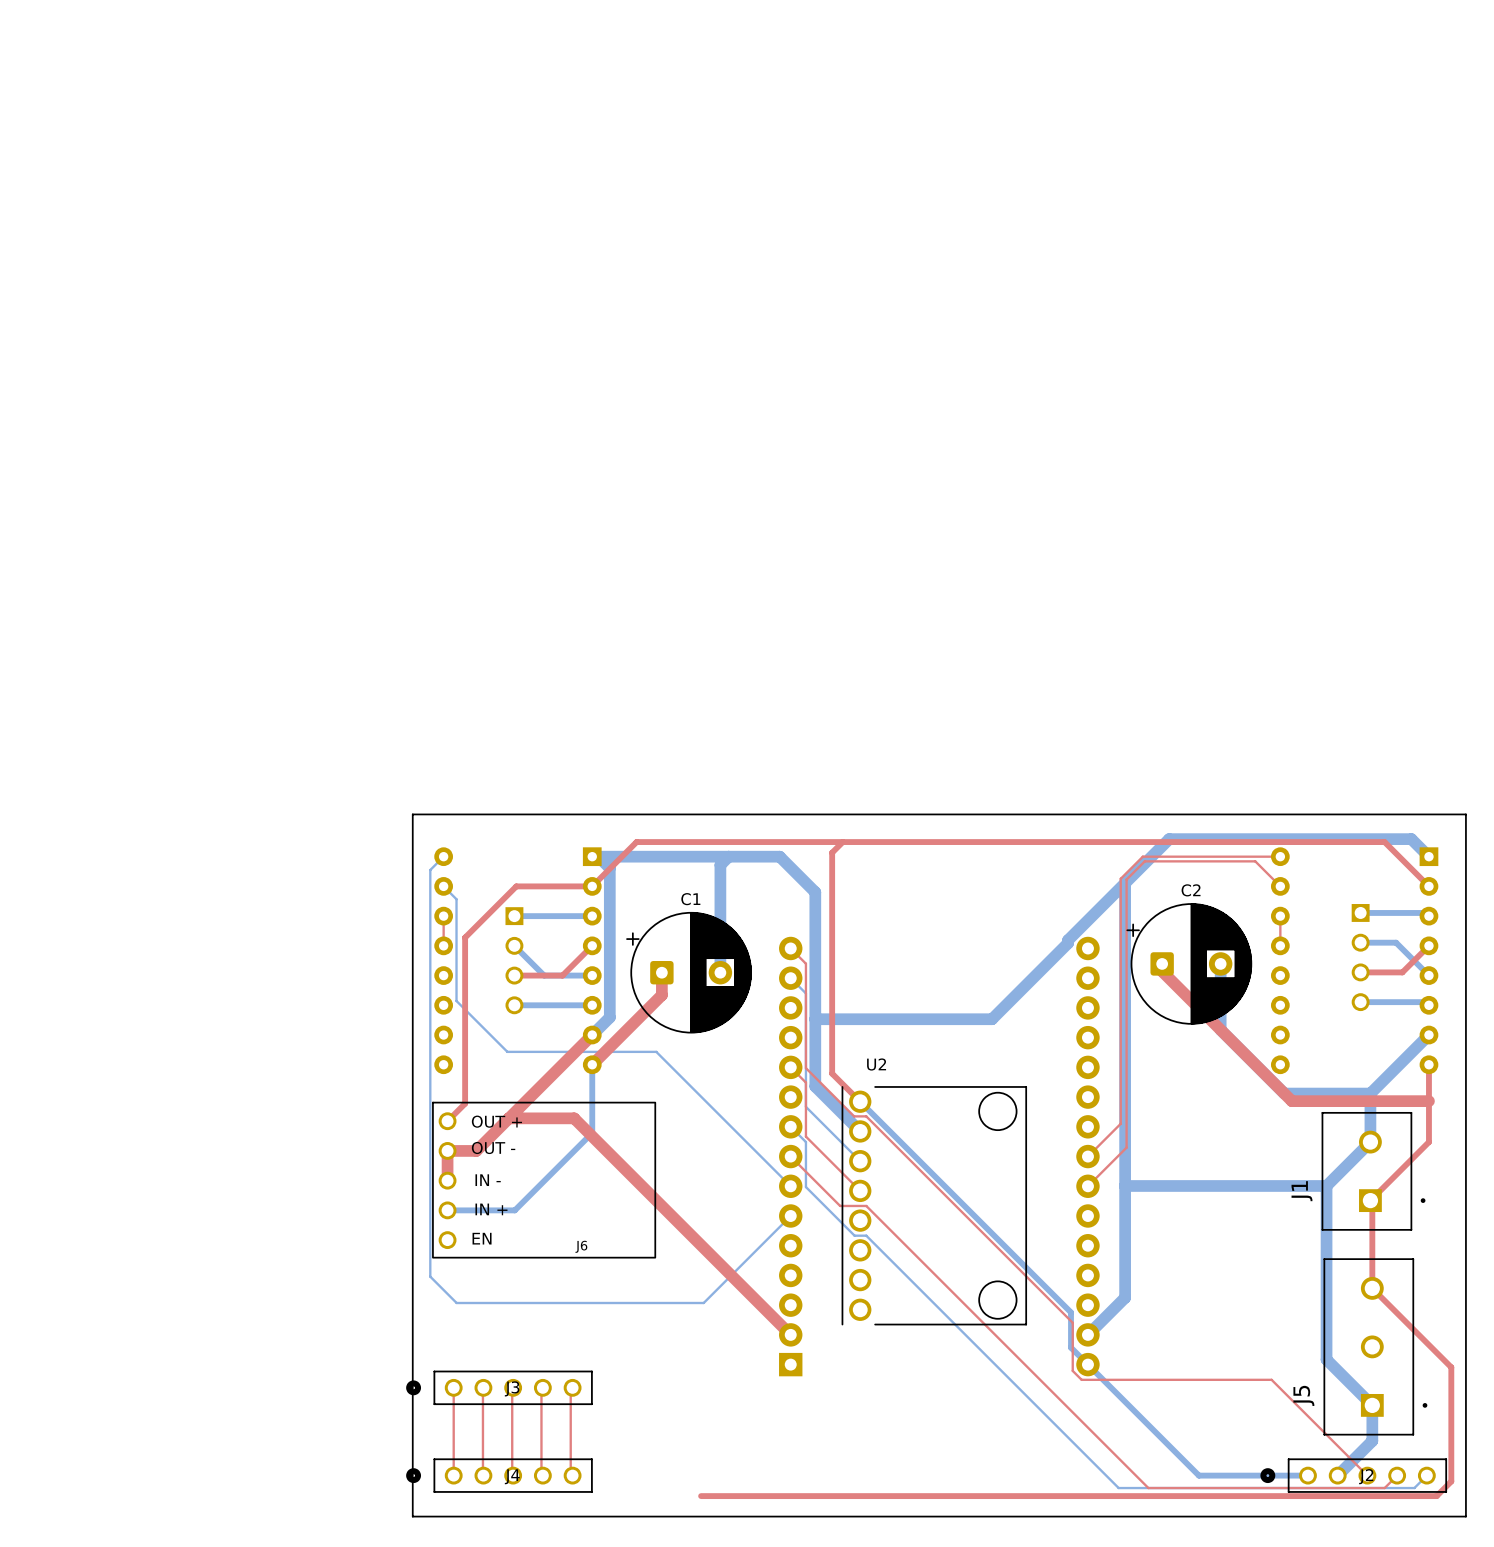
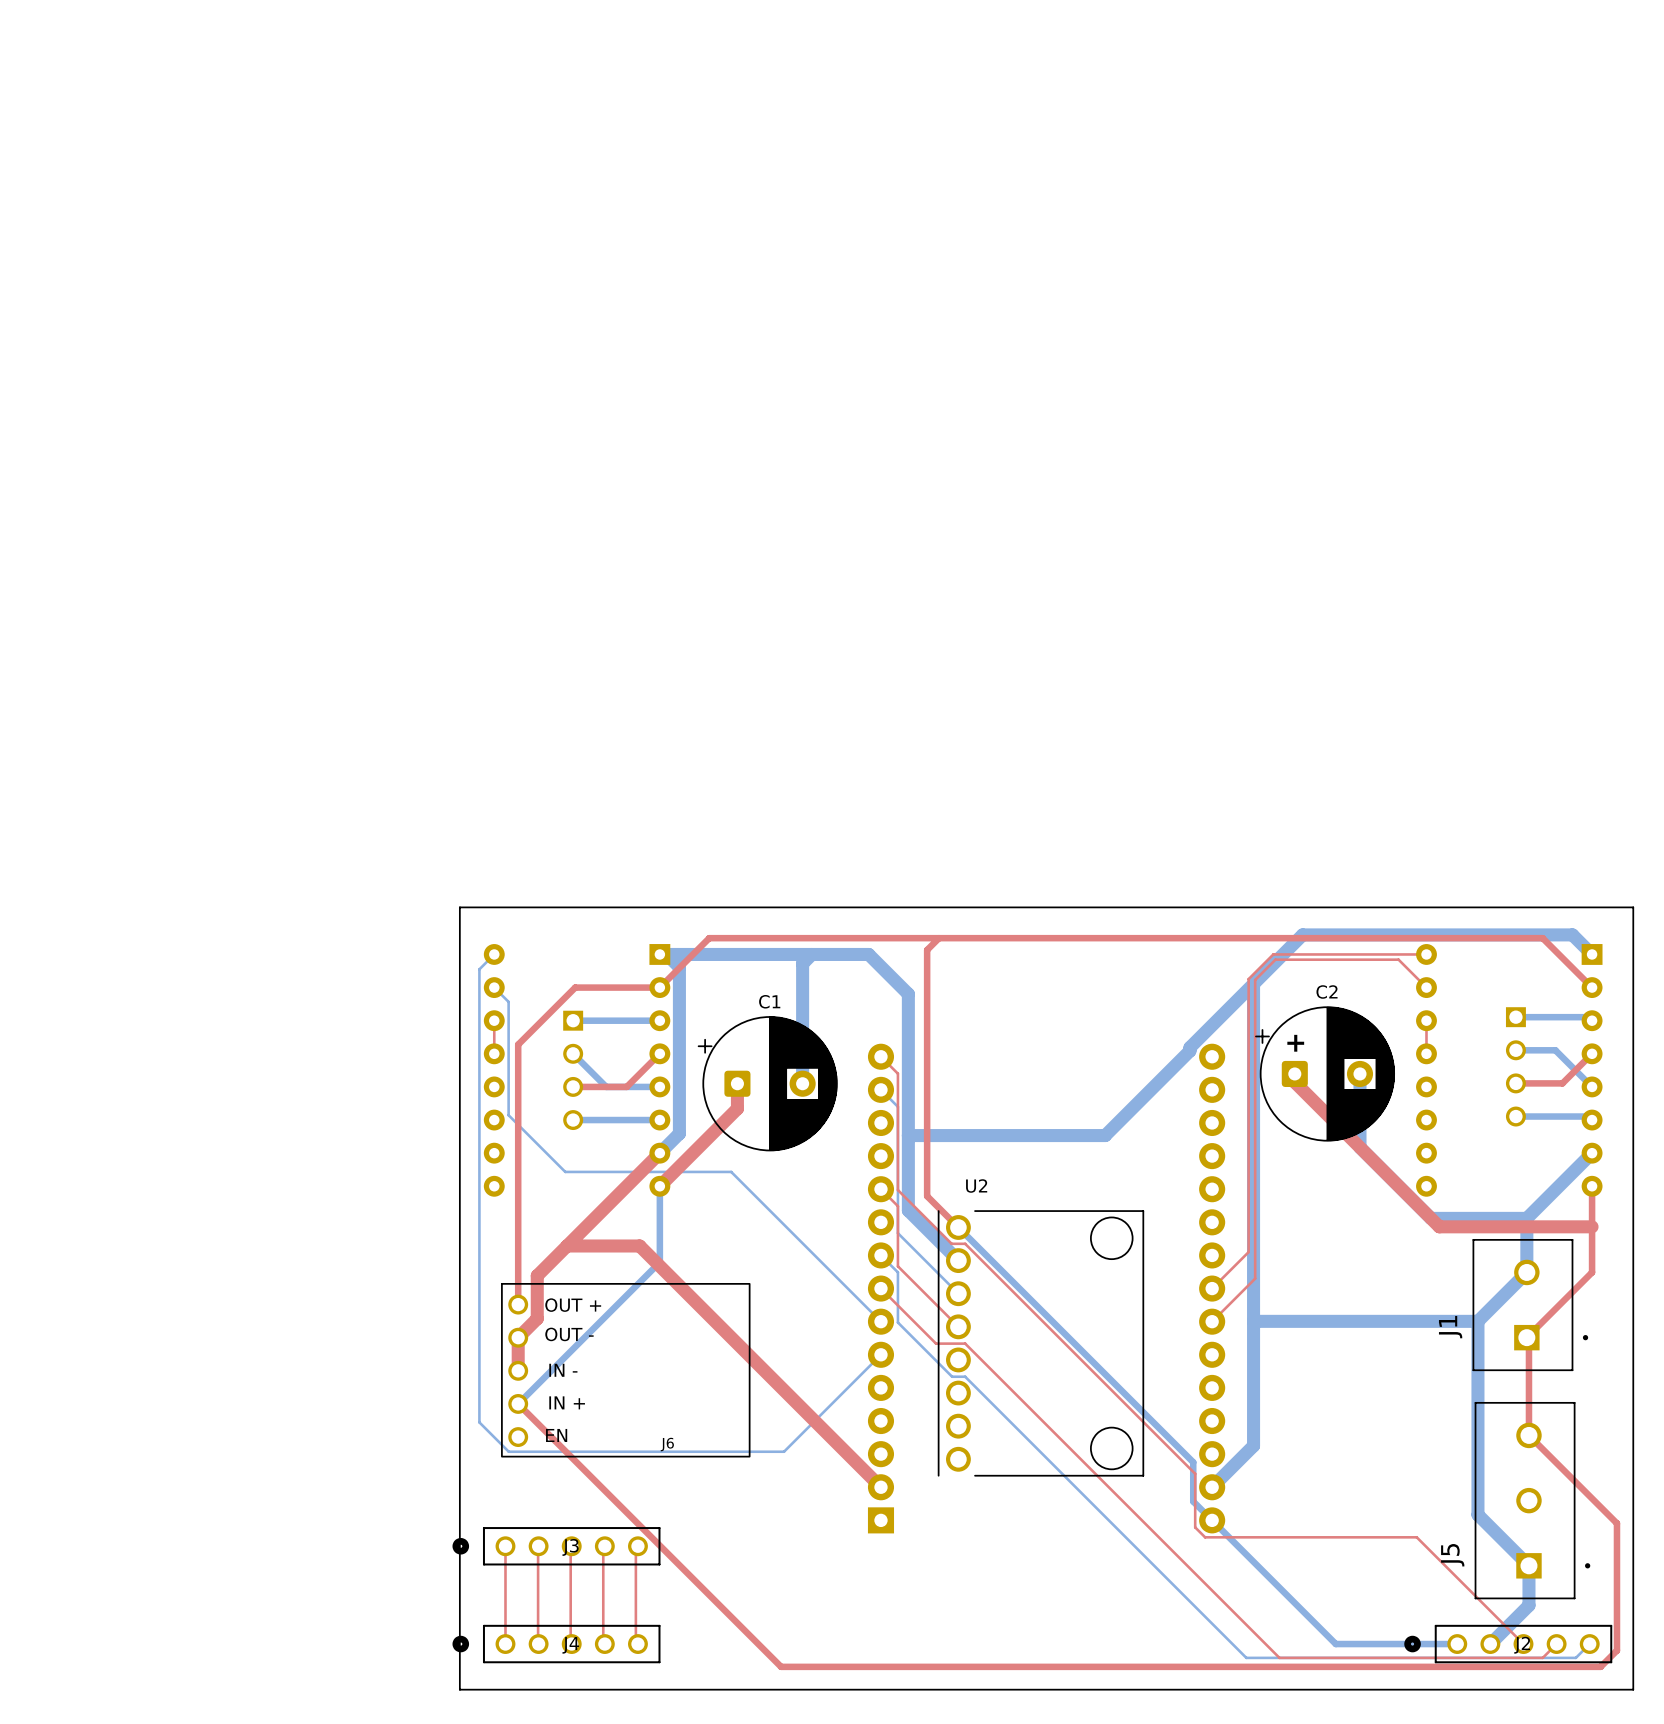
text: none -> + (1295, 1043)
top track: (465, 1103) (447, 1121) -> (518, 1229) (518, 1304)
top track: (482, 1145) (476, 1150) (447, 1150) (447, 1180) -> (537, 1275) (537, 1318) (518, 1337) (518, 1370)
J6 position: (544, 1180) -> (625, 1370)
bottom track: (447, 1210) (514, 1210) -> (518, 1403) (573, 1348)
top track: none -> (518, 1403) (781, 1666)

